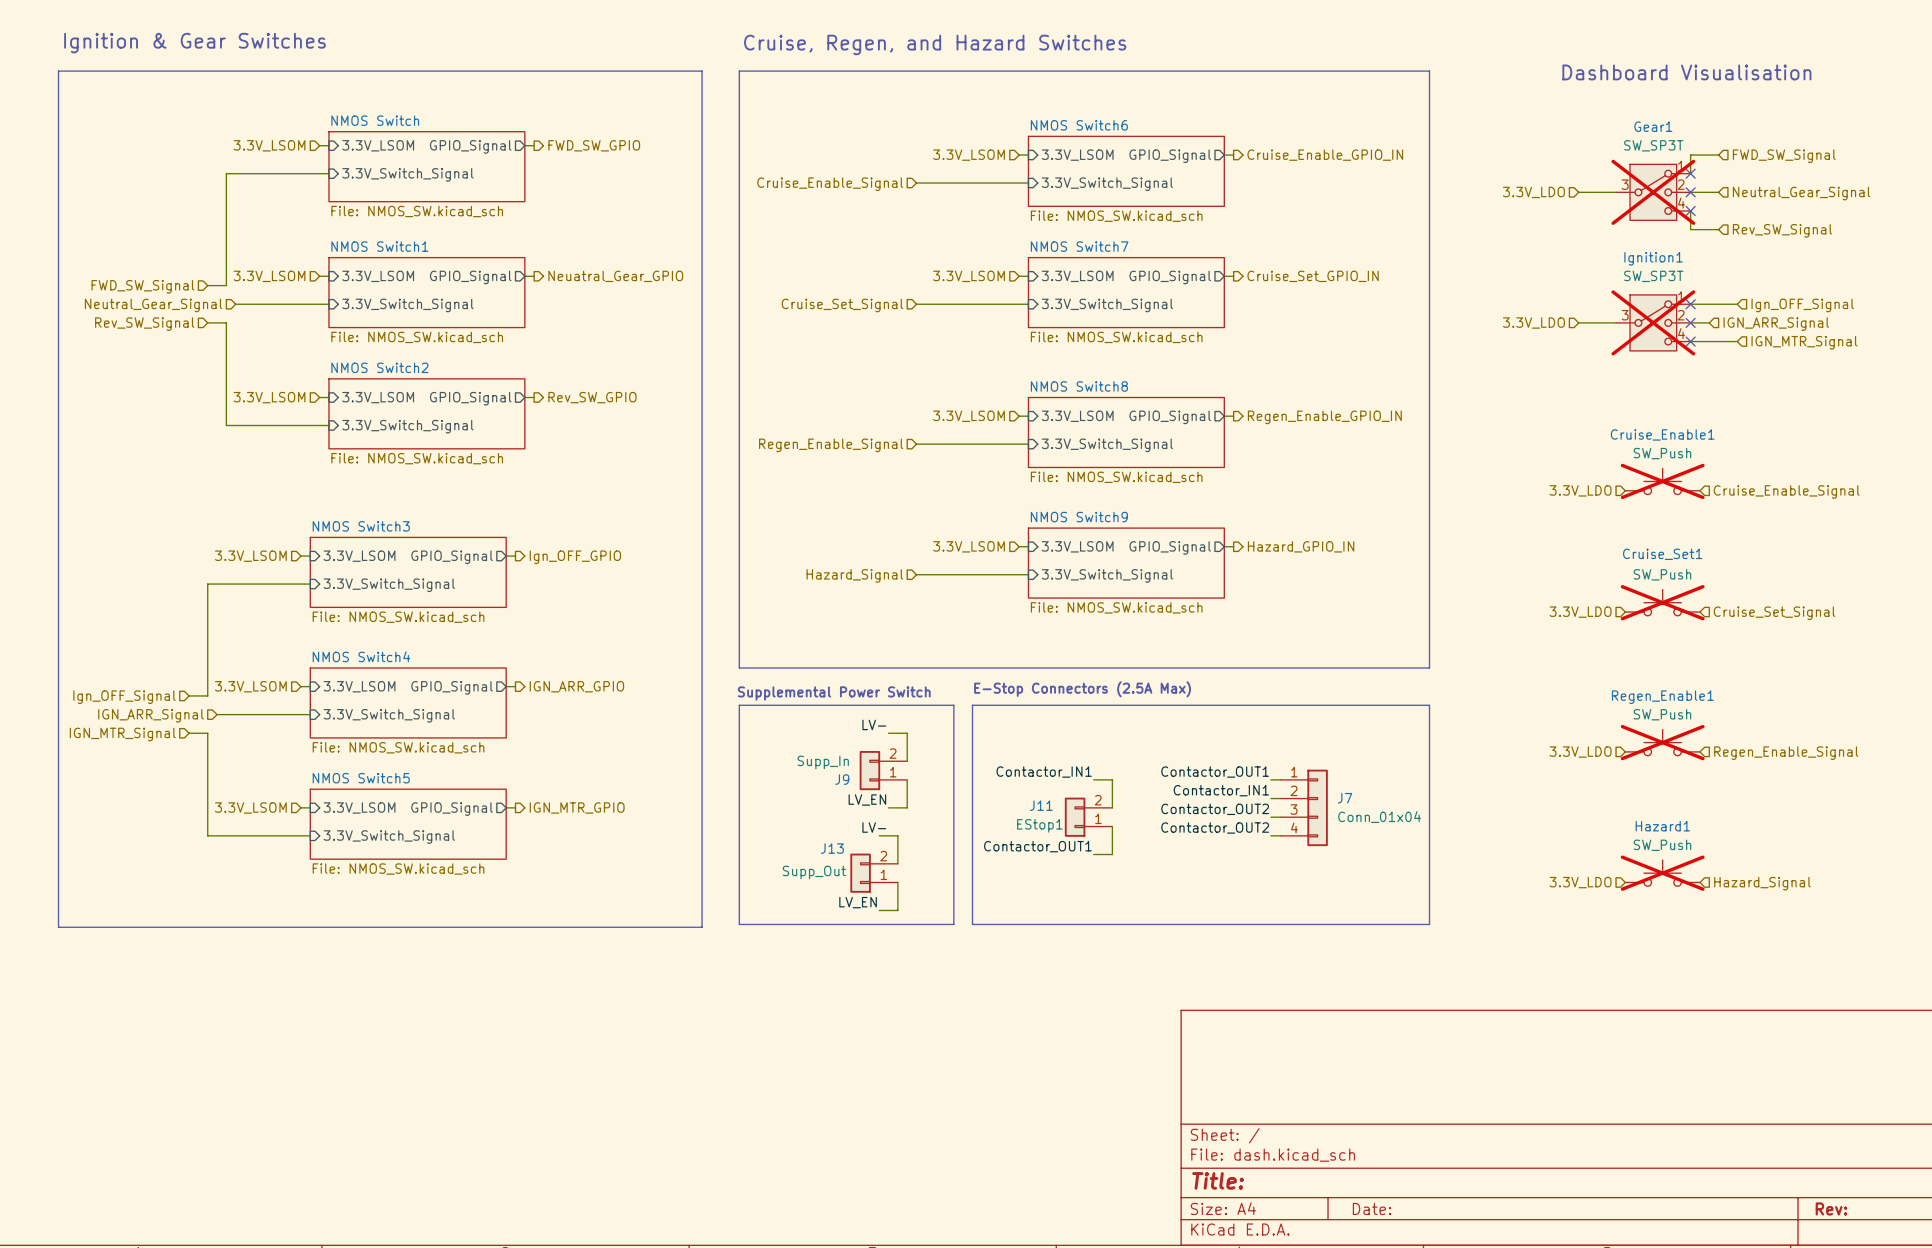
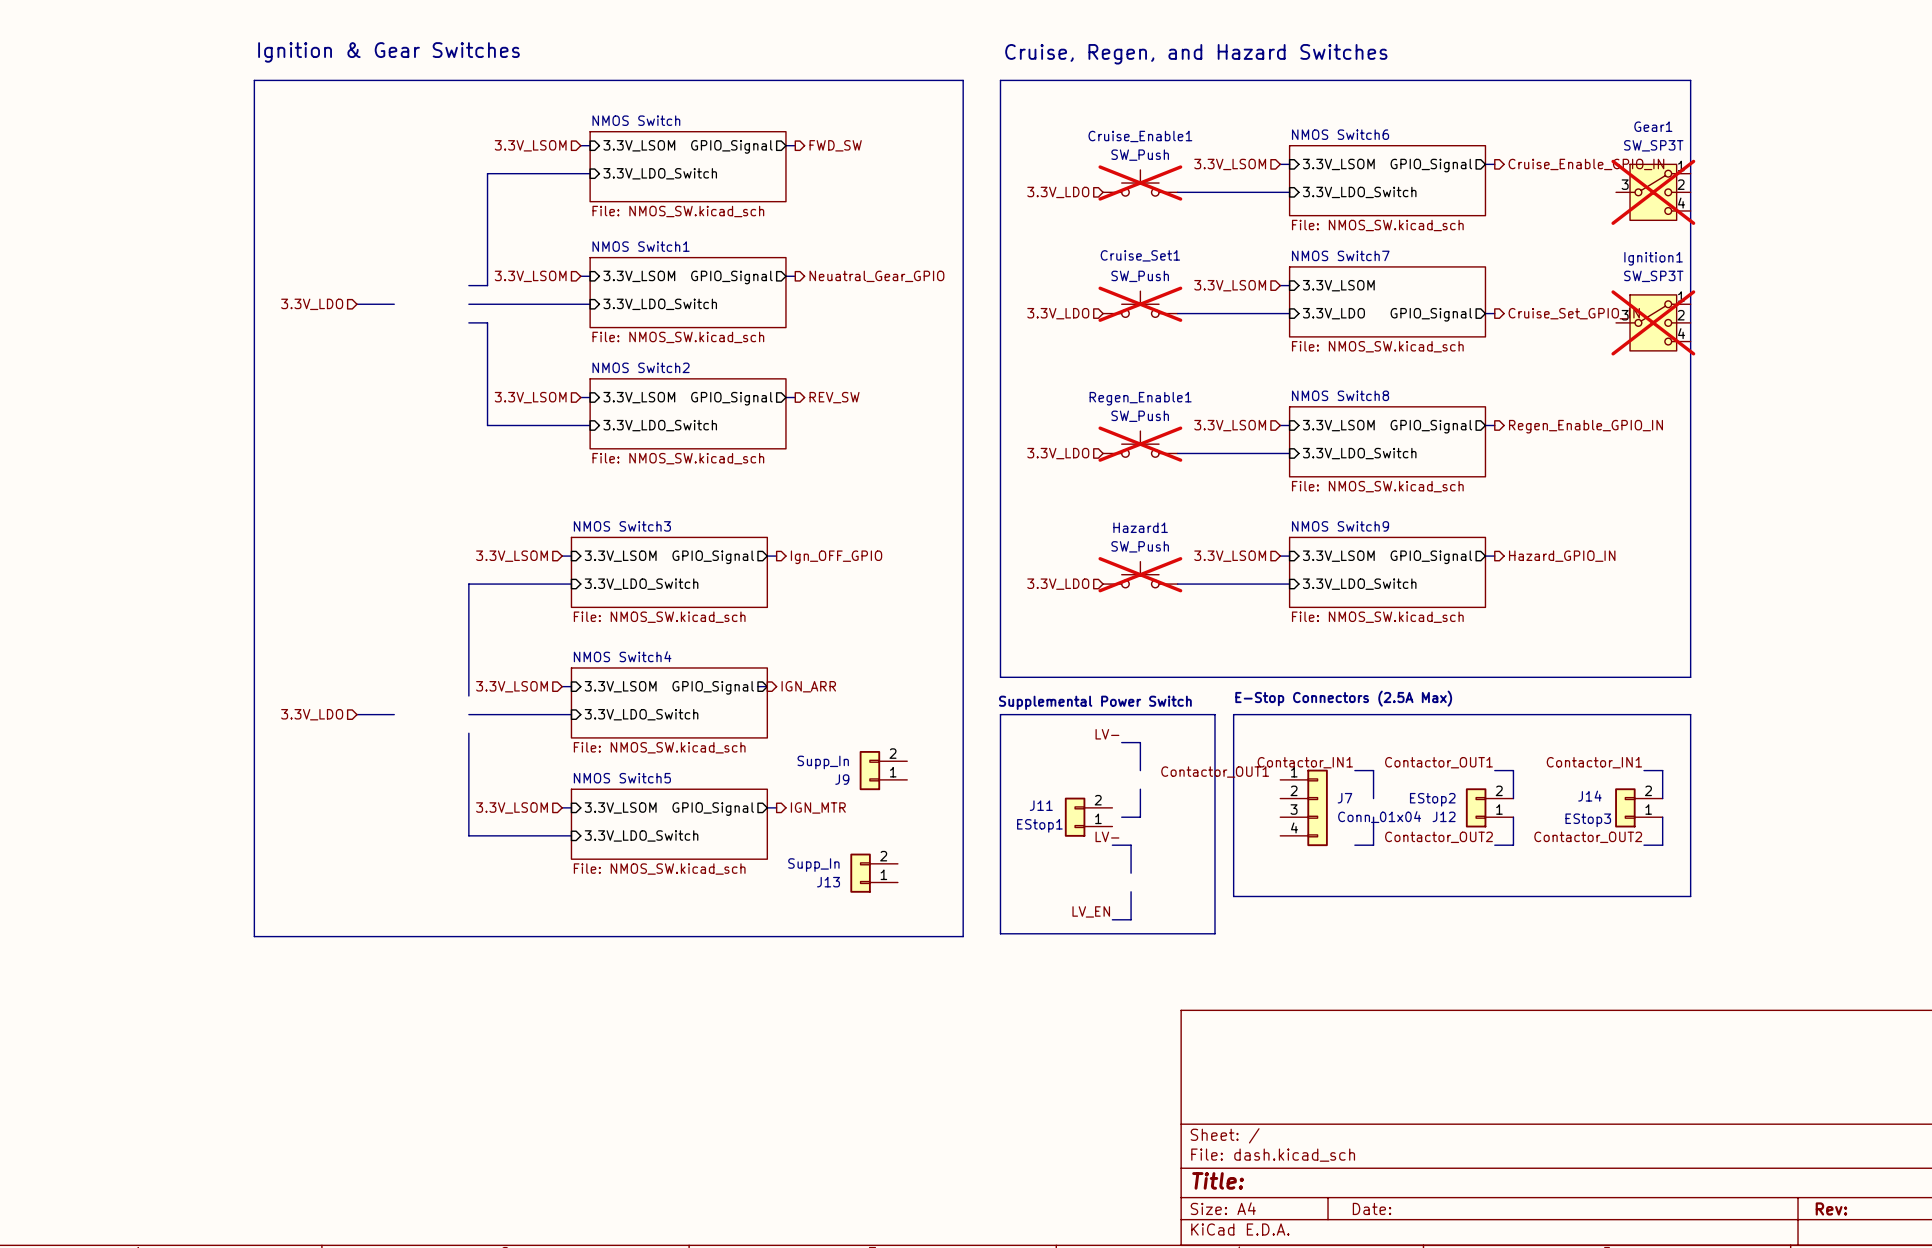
text: Ignition & Gear Switches (195, 43) -> none
text: Cruise, Regen, and Hazard Switches (935, 44) -> none
text: none -> Ignition & Gear Switches (388, 52)
text: none -> Cruise, Regen, and Hazard Switches (1196, 54)
line: (58, 71) (702, 71) (702, 927) (58, 927) (58, 71) -> none
line: (739, 71) (1429, 71) (1429, 667) (739, 667) (739, 71) -> none
text: Dashboard Visualisation (1686, 72) -> none
line: none -> (254, 80) (963, 80) (963, 936) (254, 936) (254, 80)
line: none -> (1000, 80) (1690, 80) (1690, 677) (1000, 677) (1000, 80)
hierarchical label: 3.3V_LSOM (269, 145) -> none
wire: (319, 145) (328, 145) -> none
sheet pin: 3.3V_LSOM (378, 145) -> none
wire: (524, 145) (534, 145) -> (580, 145) (590, 145)
hierarchical label: none -> 3.3V_LSOM (530, 145)
hierarchical label: FWD_SW_GPIO (594, 145) -> none
sheet pin: none -> 3.3V_LSOM (639, 145)
wire: none -> (785, 145) (795, 145)
hierarchical label: none -> FWD_SW (835, 145)
sheet pin: GPIO_Signal (470, 146) -> none
sheet pin: none -> GPIO_Signal (731, 146)
hierarchical label: 3.3V_LSOM (969, 155) -> none
wire: (1019, 155) (1028, 155) -> none
sheet pin: 3.3V_LSOM (1077, 155) -> none
wire: (1224, 155) (1233, 155) -> (1280, 164) (1289, 164)
hierarchical label: Cruise_Enable_GPIO_IN (1325, 155) -> none
wire: (1718, 155) (1690, 155) (1690, 173) -> none
sheet pin: GPIO_Signal (1170, 156) -> none
hierarchical label: FWD_SW_Signal (1784, 156) -> none
hierarchical label: none -> 3.3V_LSOM (1230, 164)
sheet pin: none -> 3.3V_LSOM (1338, 164)
wire: none -> (1485, 164) (1494, 164)
hierarchical label: none -> Cruise_Enable_GPIO_IN (1586, 164)
sheet pin: none -> GPIO_Signal (1431, 165)
sheet NMOS Switch: File: NMOS_SW.kicad_sch (426, 166) -> none
sheet NMOS Switch: none -> File: NMOS_SW.kicad_sch (688, 166)
sheet NMOS Switch6 position: (1126, 171) -> (1387, 180)
wire: (328, 173) (226, 173) (226, 285) (207, 285) -> none
wire: none -> (590, 173) (487, 173) (487, 285) (468, 285)
sheet pin: none -> 3.3V_LDO_Switch (660, 173)
no-connect mark: (1690, 173) -> none
sheet pin: 3.3V_Switch_Signal (407, 174) -> none
wire: (916, 183) (1028, 183) -> none
hierarchical label: Cruise_Enable_Signal (830, 184) -> none
sheet pin: 3.3V_Switch_Signal (1107, 184) -> none
hierarchical label: none -> 3.3V_LDO (1058, 192)
wire: none -> (1177, 192) (1289, 192)
sheet pin: none -> 3.3V_LDO_Switch (1359, 192)
hierarchical label: 3.3V_LDO (1533, 192) -> none
wire: (1578, 192) (1616, 192) -> none
wire: (1690, 192) (1718, 192) -> none
no-connect mark: (1690, 192) -> none
hierarchical label: Neutral_Gear_Signal (1801, 193) -> none
wire: (1690, 210) (1690, 229) (1718, 229) -> none
no-connect mark: (1690, 210) -> none
hierarchical label: Rev_SW_Signal (1782, 230) -> none
hierarchical label: 3.3V_LSOM (269, 276) -> none
wire: (319, 276) (328, 276) -> none
sheet pin: 3.3V_LSOM (378, 276) -> none
wire: (524, 276) (534, 276) -> (580, 276) (590, 276)
hierarchical label: none -> 3.3V_LSOM (530, 276)
hierarchical label: Neuatral_Gear_GPIO (615, 276) -> none
sheet pin: none -> 3.3V_LSOM (639, 276)
wire: none -> (785, 276) (795, 276)
hierarchical label: none -> Neuatral_Gear_GPIO (876, 276)
hierarchical label: 3.3V_LSOM (969, 276) -> none
wire: (1019, 276) (1028, 276) -> none
sheet pin: 3.3V_LSOM (1077, 276) -> none
wire: (1224, 276) (1233, 276) -> (1280, 285) (1289, 285)
hierarchical label: Cruise_Set_GPIO_IN (1313, 276) -> none
sheet pin: GPIO_Signal (470, 277) -> none
sheet pin: none -> GPIO_Signal (731, 277)
sheet pin: GPIO_Signal (1170, 277) -> none
hierarchical label: none -> 3.3V_LSOM (1230, 285)
sheet pin: none -> 3.3V_LSOM (1338, 285)
hierarchical label: FWD_SW_Signal (142, 286) -> none
sheet NMOS Switch1 position: (426, 292) -> (688, 292)
sheet NMOS Switch7 position: (1126, 292) -> (1387, 301)
wire: (235, 304) (328, 304) -> none
hierarchical label: none -> 3.3V_LDO (312, 304)
wire: none -> (356, 304) (394, 304)
wire: none -> (468, 304) (590, 304)
sheet pin: none -> 3.3V_LDO_Switch (660, 304)
wire: (916, 304) (1028, 304) -> none
wire: (1690, 304) (1737, 304) -> none
no-connect mark: (1690, 304) -> none
hierarchical label: Neutral_Gear_Signal (153, 305) -> none
sheet pin: 3.3V_Switch_Signal (407, 305) -> none
hierarchical label: Cruise_Set_Signal (842, 305) -> none
sheet pin: 3.3V_Switch_Signal (1107, 305) -> none
hierarchical label: Ign_OFF_Signal (1802, 305) -> none
hierarchical label: none -> 3.3V_LDO (1058, 313)
wire: none -> (1177, 313) (1289, 313)
sheet pin: none -> 3.3V_LDO (1333, 313)
wire: none -> (1485, 313) (1494, 313)
hierarchical label: none -> Cruise_Set_GPIO_IN (1574, 313)
sheet pin: none -> GPIO_Signal (1431, 314)
wire: (207, 322) (226, 322) (226, 425) (328, 425) -> none
wire: none -> (468, 322) (487, 322) (487, 425) (590, 425)
wire: (1578, 322) (1616, 322) -> none
wire: (1690, 322) (1709, 322) -> none
no-connect mark: (1690, 322) -> none
hierarchical label: 3.3V_LDO (1533, 323) -> none
hierarchical label: Rev_SW_Signal (144, 324) -> none
hierarchical label: IGN_ARR_Signal (1776, 324) -> none
wire: (1690, 341) (1737, 341) -> none
no-connect mark: (1690, 341) -> none
hierarchical label: IGN_MTR_Signal (1804, 342) -> none
hierarchical label: 3.3V_LSOM (269, 397) -> none
wire: (319, 397) (328, 397) -> none
sheet pin: 3.3V_LSOM (378, 397) -> none
wire: (524, 397) (534, 397) -> (580, 397) (590, 397)
hierarchical label: none -> 3.3V_LSOM (530, 397)
hierarchical label: Rev_SW_GPIO (592, 397) -> none
sheet pin: none -> 3.3V_LSOM (639, 397)
wire: none -> (785, 397) (795, 397)
hierarchical label: none -> REV_SW (834, 397)
sheet pin: GPIO_Signal (470, 398) -> none
sheet pin: none -> GPIO_Signal (731, 398)
sheet NMOS Switch2 position: (426, 413) -> (688, 413)
hierarchical label: 3.3V_LSOM (969, 416) -> none
wire: (1019, 416) (1028, 416) -> none
sheet pin: 3.3V_LSOM (1077, 416) -> none
wire: (1224, 416) (1233, 416) -> (1280, 425) (1289, 425)
sheet pin: GPIO_Signal (1170, 417) -> none
hierarchical label: Regen_Enable_GPIO_IN (1324, 417) -> none
sheet pin: none -> 3.3V_LDO_Switch (660, 425)
hierarchical label: none -> 3.3V_LSOM (1230, 425)
sheet pin: none -> 3.3V_LSOM (1338, 425)
wire: none -> (1485, 425) (1494, 425)
sheet pin: 3.3V_Switch_Signal (407, 426) -> none
sheet pin: none -> GPIO_Signal (1431, 426)
hierarchical label: none -> Regen_Enable_GPIO_IN (1585, 426)
sheet NMOS Switch8 position: (1126, 432) -> (1387, 441)
wire: (916, 444) (1028, 444) -> none
hierarchical label: Regen_Enable_Signal (831, 445) -> none
sheet pin: 3.3V_Switch_Signal (1107, 445) -> none
hierarchical label: none -> 3.3V_LDO (1058, 453)
wire: none -> (1177, 453) (1289, 453)
sheet pin: none -> 3.3V_LDO_Switch (1359, 453)
Cruise_Enable1 position: (1662, 481) -> (1140, 183)
hierarchical label: 3.3V_LDO (1580, 490) -> none
hierarchical label: Cruise_Enable_Signal (1786, 491) -> none
hierarchical label: 3.3V_LSOM (969, 546) -> none
wire: (1019, 546) (1028, 546) -> none
sheet pin: 3.3V_LSOM (1077, 546) -> none
wire: (1224, 546) (1233, 546) -> (1280, 556) (1289, 556)
hierarchical label: Hazard_GPIO_IN (1301, 546) -> none
sheet pin: GPIO_Signal (1170, 547) -> none
hierarchical label: 3.3V_LSOM (250, 556) -> none
wire: (300, 556) (310, 556) -> none
sheet pin: 3.3V_LSOM (359, 556) -> none
wire: (506, 556) (515, 556) -> (562, 556) (571, 556)
hierarchical label: none -> 3.3V_LSOM (512, 556)
sheet pin: none -> 3.3V_LSOM (620, 556)
wire: none -> (767, 556) (776, 556)
hierarchical label: none -> 3.3V_LSOM (1230, 556)
sheet pin: none -> 3.3V_LSOM (1338, 556)
wire: none -> (1485, 556) (1494, 556)
hierarchical label: none -> Hazard_GPIO_IN (1562, 556)
sheet pin: GPIO_Signal (452, 557) -> none
hierarchical label: Ign_OFF_GPIO (575, 557) -> none
sheet pin: none -> GPIO_Signal (713, 557)
hierarchical label: none -> Ign_OFF_GPIO (836, 557)
sheet pin: none -> GPIO_Signal (1431, 557)
sheet NMOS Switch9 position: (1126, 563) -> (1387, 572)
sheet NMOS Switch3 position: (408, 572) -> (669, 572)
wire: (916, 574) (1028, 574) -> none
hierarchical label: Hazard_Signal (854, 575) -> none
sheet pin: 3.3V_Switch_Signal (1107, 575) -> none
wire: (310, 584) (207, 584) (207, 695) (189, 695) -> none
wire: none -> (571, 584) (468, 584) (468, 695)
sheet pin: none -> 3.3V_LDO_Switch (641, 584)
hierarchical label: none -> 3.3V_LDO (1058, 584)
wire: none -> (1177, 584) (1289, 584)
sheet pin: none -> 3.3V_LDO_Switch (1359, 584)
sheet pin: 3.3V_Switch_Signal (389, 585) -> none
Cruise_Set1 position: (1662, 602) -> (1140, 304)
hierarchical label: 3.3V_LDO (1580, 612) -> none
hierarchical label: Cruise_Set_Signal (1774, 613) -> none
hierarchical label: 3.3V_LSOM (250, 686) -> none
wire: (300, 686) (310, 686) -> none
sheet pin: 3.3V_LSOM (359, 686) -> none
wire: (506, 686) (515, 686) -> (562, 686) (571, 686)
hierarchical label: none -> 3.3V_LSOM (512, 686)
hierarchical label: IGN_ARR_GPIO (576, 686) -> none
sheet pin: none -> 3.3V_LSOM (620, 686)
wire: none -> (757, 686) (767, 686)
hierarchical label: none -> IGN_ARR (808, 686)
sheet pin: GPIO_Signal (452, 687) -> none
sheet pin: none -> GPIO_Signal (713, 687)
text: E-Stop Connectors (2.5A Max) (1082, 689) -> none
text: Supplemental Power Switch (834, 693) -> none
hierarchical label: Ign_OFF_Signal (124, 697) -> none
text: none -> E-Stop Connectors (2.5A Max) (1343, 698)
sheet NMOS Switch4 position: (408, 702) -> (669, 702)
text: none -> Supplemental Power Switch (1095, 702)
line: (739, 705) (739, 924) (953, 924) (953, 705) (739, 705) -> none
line: (972, 705) (1429, 705) (1429, 924) (972, 924) (972, 705) -> none
wire: (217, 714) (310, 714) -> none
hierarchical label: none -> 3.3V_LDO (312, 714)
wire: none -> (356, 714) (394, 714)
wire: none -> (468, 714) (571, 714)
sheet pin: none -> 3.3V_LDO_Switch (641, 714)
line: none -> (1000, 714) (1000, 933) (1214, 933) (1214, 714) (1000, 714)
line: none -> (1233, 714) (1690, 714) (1690, 896) (1233, 896) (1233, 714)
hierarchical label: IGN_ARR_Signal (150, 715) -> none
sheet pin: 3.3V_Switch_Signal (389, 715) -> none
label: LV- (874, 724) -> none
wire: (189, 733) (207, 733) (207, 835) (310, 835) -> none
wire: none -> (468, 733) (468, 835) (571, 835)
wire: (888, 733) (907, 733) (907, 761) -> none
hierarchical label: IGN_MTR_Signal (122, 734) -> none
label: none -> LV- (1107, 734)
Regen_Enable1 position: (1662, 742) -> (1140, 444)
hierarchical label: 3.3V_LDO (1580, 752) -> none
hierarchical label: Regen_Enable_Signal (1786, 753) -> none
label: none -> Contactor_OUT1 (1438, 762)
label: none -> Contactor_IN1 (1594, 762)
wire: none -> (1354, 770) (1373, 770) (1373, 798)
wire: none -> (1494, 770) (1513, 770) (1513, 798)
wire: none -> (1644, 770) (1662, 770) (1662, 798)
label: Contactor_IN1 (1044, 772) -> none
wire: (907, 779) (907, 807) (888, 807) -> none
wire: (1093, 779) (1112, 779) (1112, 807) -> (1121, 742) (1140, 742) (1140, 770)
wire: (1270, 779) (1280, 779) -> none
label position: Contactor_IN1 (1221, 790) -> Contactor_IN1 (1305, 762)
wire: (1270, 798) (1280, 798) -> none
label: LV_EN (867, 800) -> none
hierarchical label: 3.3V_LSOM (250, 807) -> none
wire: (300, 807) (310, 807) -> none
sheet pin: 3.3V_LSOM (359, 807) -> none
wire: (506, 807) (515, 807) -> (562, 807) (571, 807)
hierarchical label: none -> 3.3V_LSOM (512, 807)
hierarchical label: IGN_MTR_GPIO (577, 807) -> none
sheet pin: none -> 3.3V_LSOM (620, 807)
wire: none -> (767, 807) (776, 807)
hierarchical label: none -> IGN_MTR (818, 807)
J12: none -> EStop2 (1489, 807)
J14: none -> EStop3 (1638, 807)
sheet pin: GPIO_Signal (452, 809) -> none
sheet pin: none -> GPIO_Signal (713, 809)
label: Contactor_OUT2 (1215, 809) -> none
wire: (1270, 817) (1280, 817) -> none
wire: none -> (1373, 817) (1373, 845) (1354, 845)
wire: none -> (1513, 817) (1513, 845) (1494, 845)
wire: none -> (1662, 817) (1662, 845) (1644, 845)
sheet NMOS Switch5 position: (408, 824) -> (669, 824)
wire: (1112, 826) (1112, 854) (1093, 854) -> (1140, 789) (1140, 817) (1121, 817)
label: LV- (874, 827) -> none
label: Contactor_OUT2 (1215, 827) -> none
sheet pin: none -> 3.3V_LDO_Switch (641, 835)
wire: (879, 835) (897, 835) (897, 863) -> none
wire: (1270, 835) (1280, 835) -> none
label: none -> LV- (1107, 836)
sheet pin: 3.3V_Switch_Signal (389, 837) -> none
label: none -> Contactor_OUT2 (1438, 837)
label: none -> Contactor_OUT2 (1588, 837)
wire: none -> (1112, 845) (1131, 845) (1131, 873)
label: Contactor_OUT1 (1037, 846) -> none
J13 name position: J13 (832, 848) -> J13 (828, 882)
J13 value: Supp_Out (814, 872) -> Supp_In (813, 865)
Hazard1 position: (1662, 873) -> (1140, 574)
wire: (897, 882) (897, 910) (879, 910) -> none
hierarchical label: 3.3V_LDO (1580, 882) -> none
hierarchical label: Hazard_Signal (1762, 883) -> none
wire: none -> (1131, 891) (1131, 919) (1112, 919)
label: LV_EN (858, 902) -> none
label: none -> LV_EN (1091, 911)

